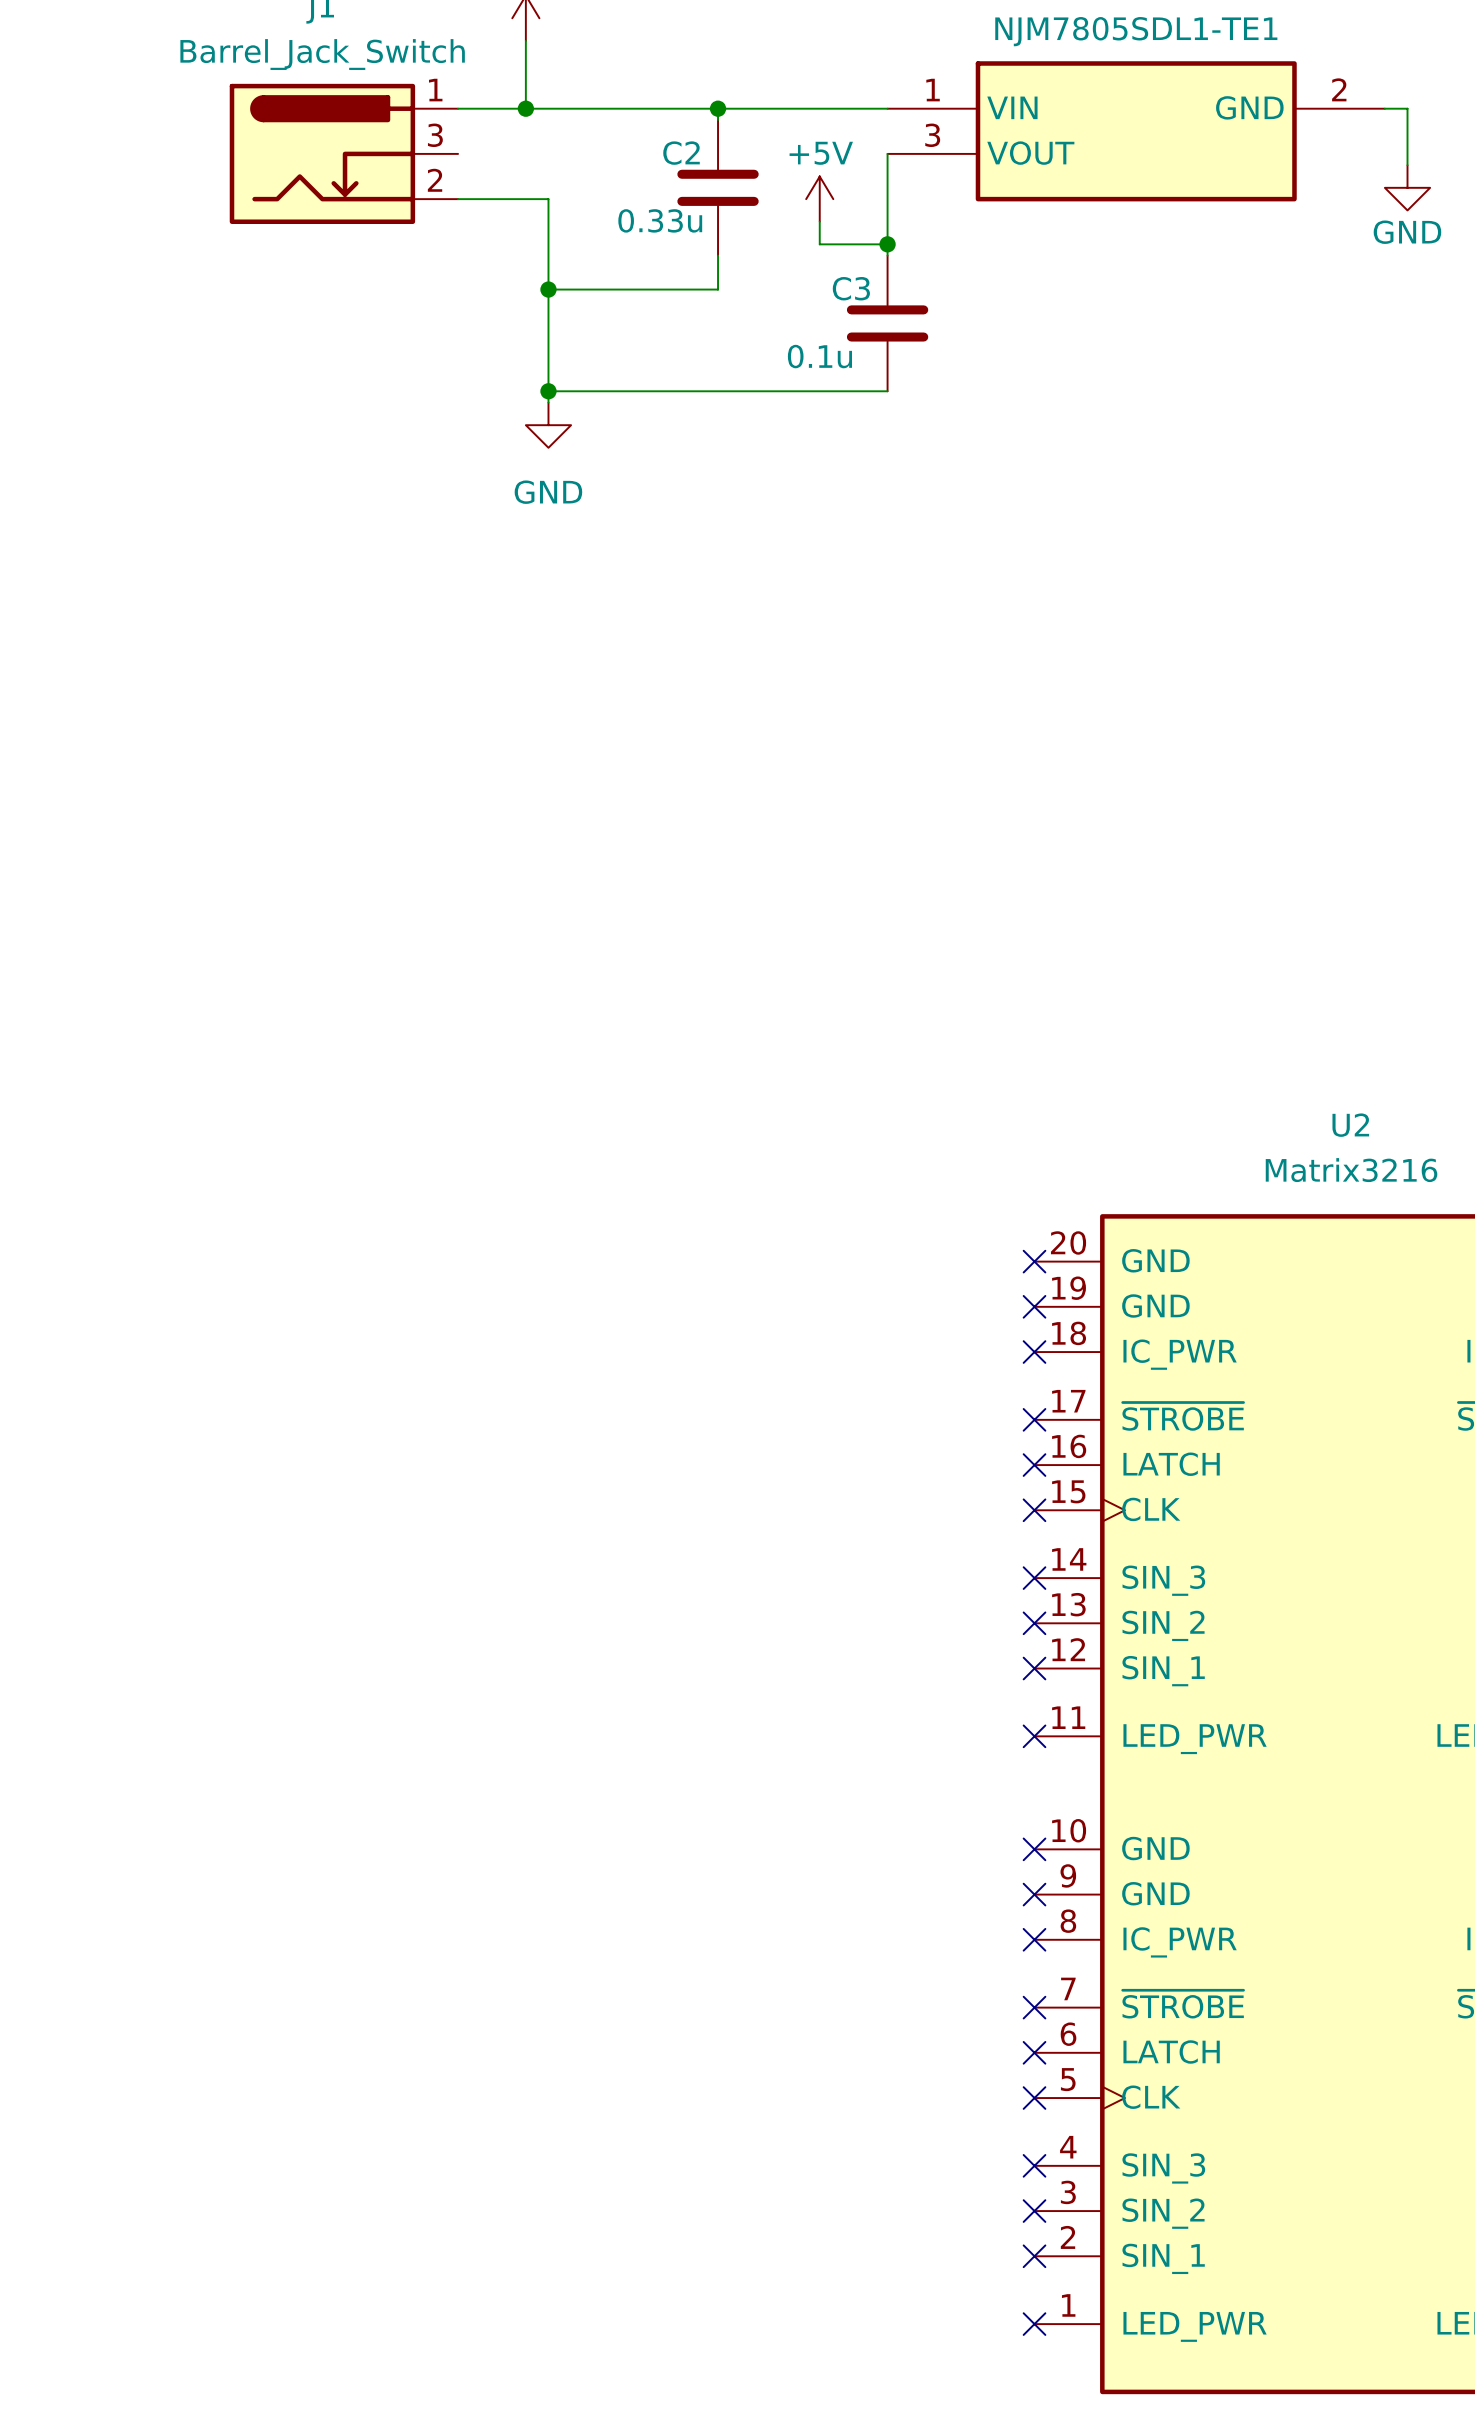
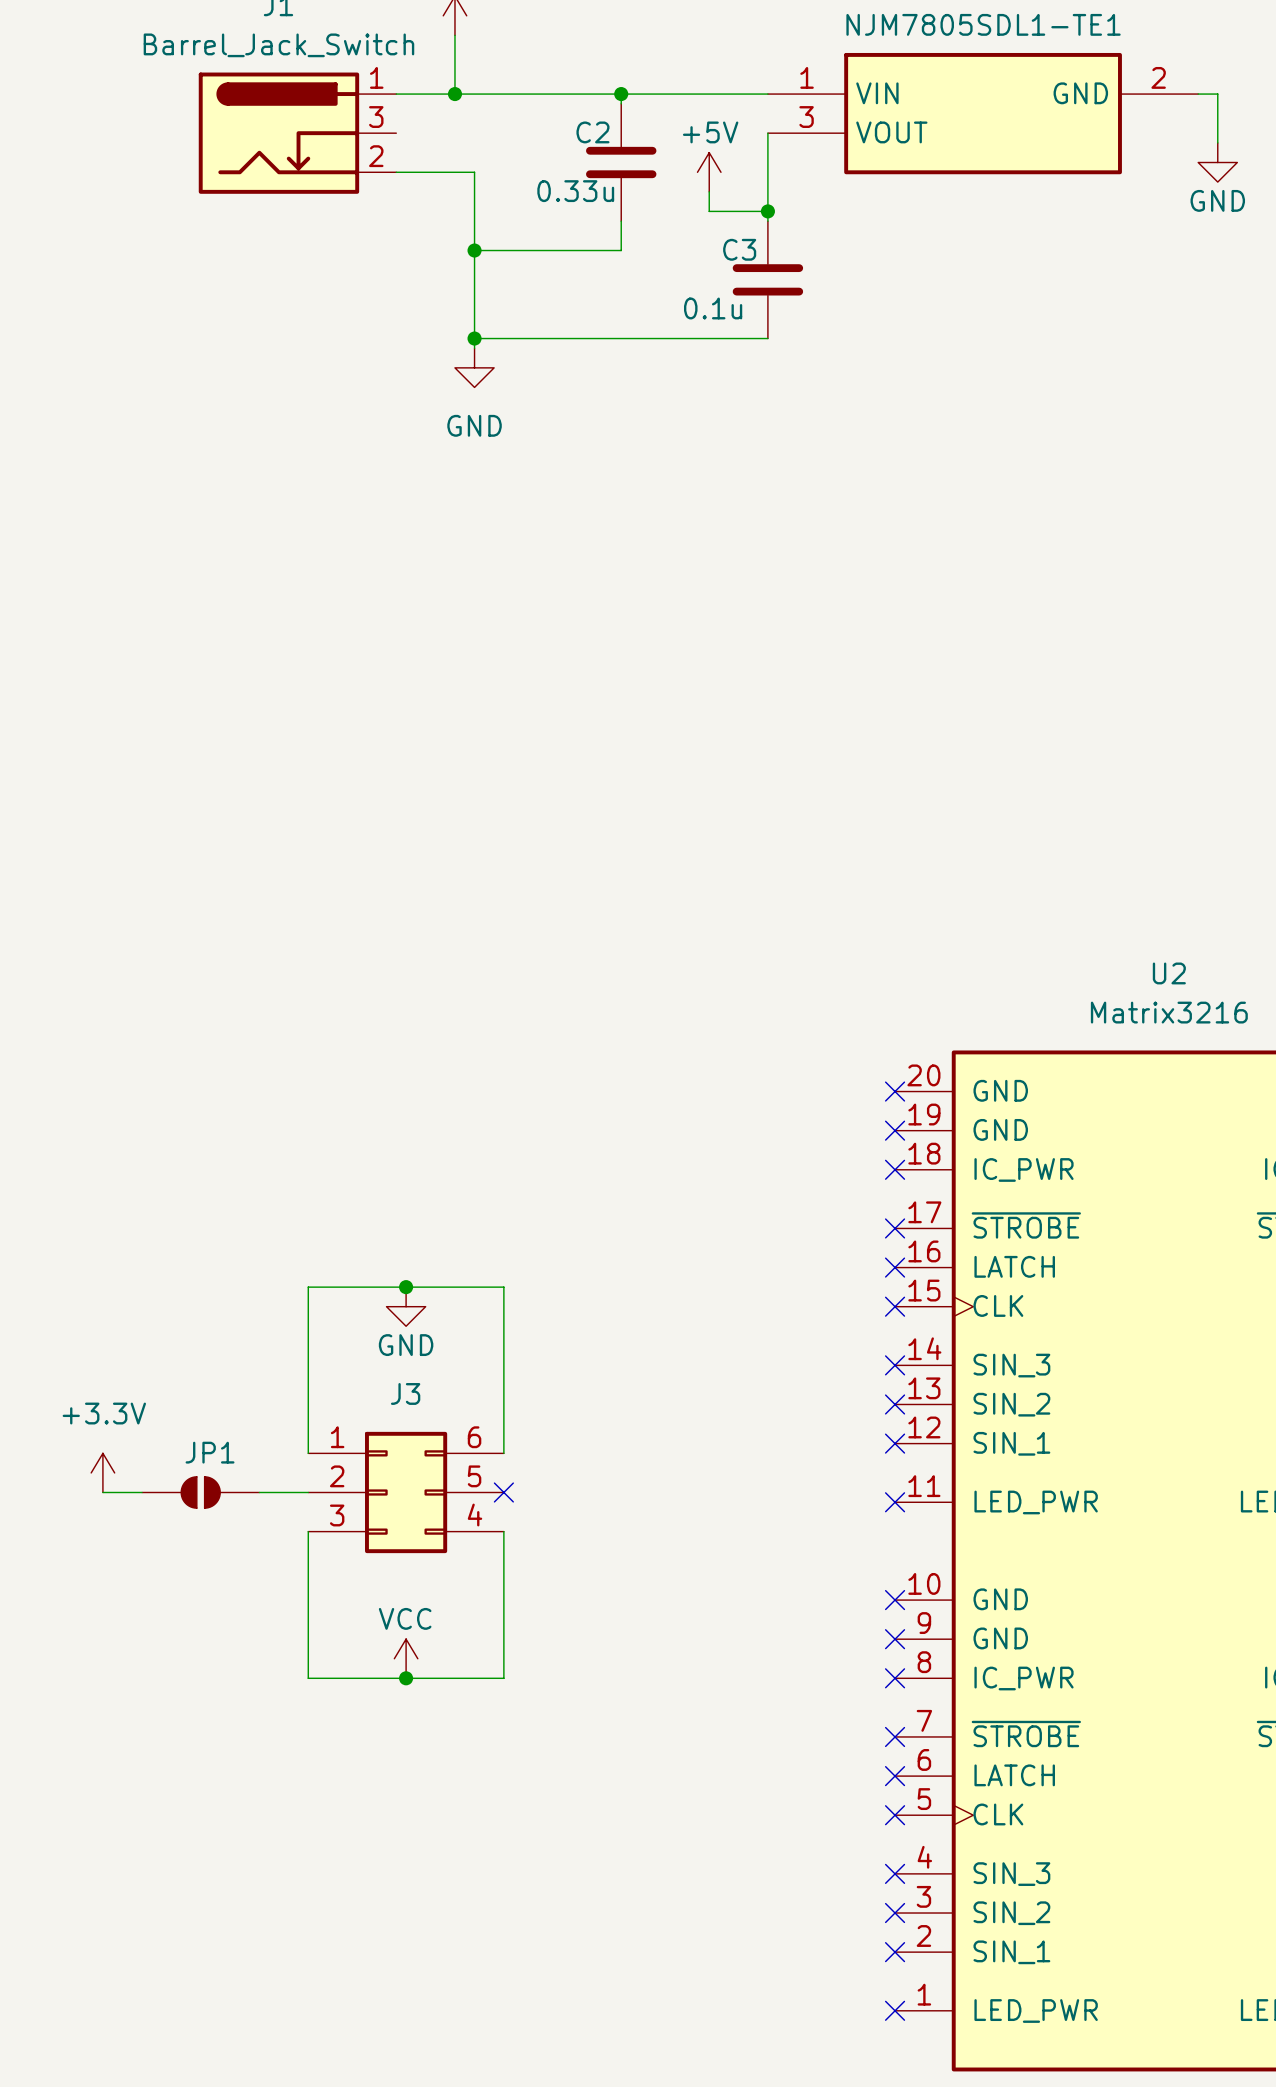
junction: none -> (406, 1287)
power symbol: none -> GND (406, 1306)
wire: none -> (308, 1453) (308, 1287) (503, 1287) (503, 1453)
power symbol: none -> +3.3V (102, 1472)
wire: none -> (102, 1492) (142, 1492)
JP1: none -> (200, 1492)
wire: none -> (259, 1492) (308, 1492)
J3: none -> (406, 1492)
no-connect mark: none -> (503, 1492)
wire: none -> (308, 1531) (308, 1678) (503, 1678) (503, 1531)
power symbol: none -> VCC (406, 1658)
junction: none -> (406, 1678)

